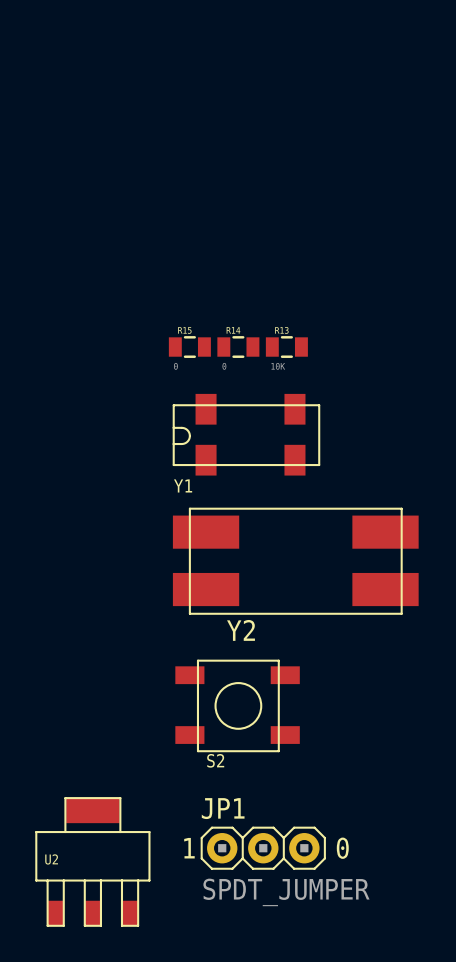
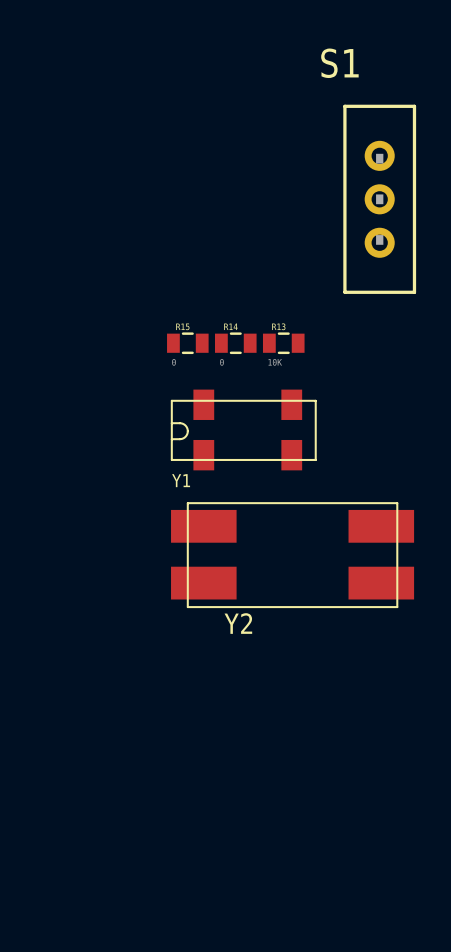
S1: none -> (379, 199)
S2: (237, 705) -> none
JP1: SPDT_JUMPER (263, 848) -> none
U2: (92, 861) -> none

